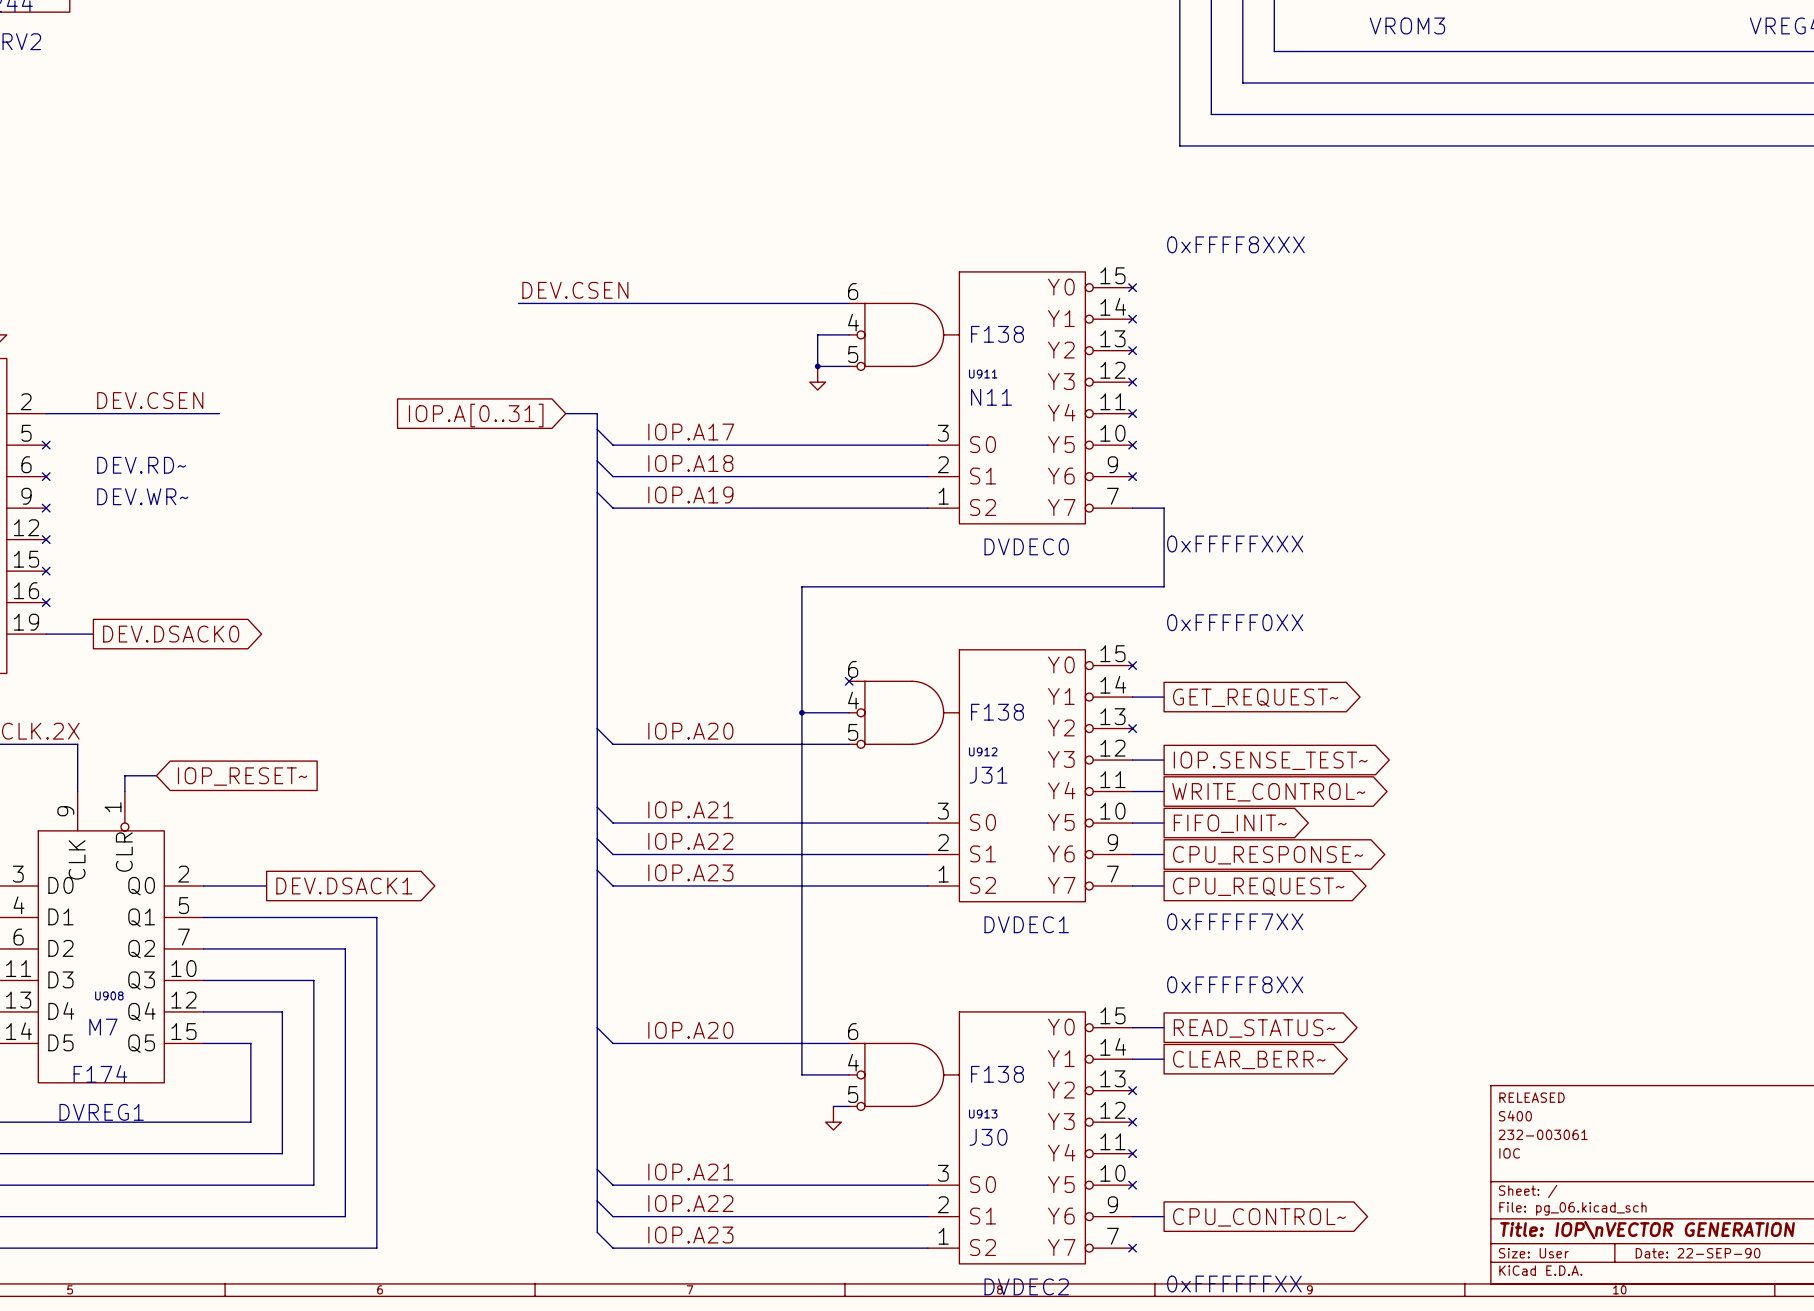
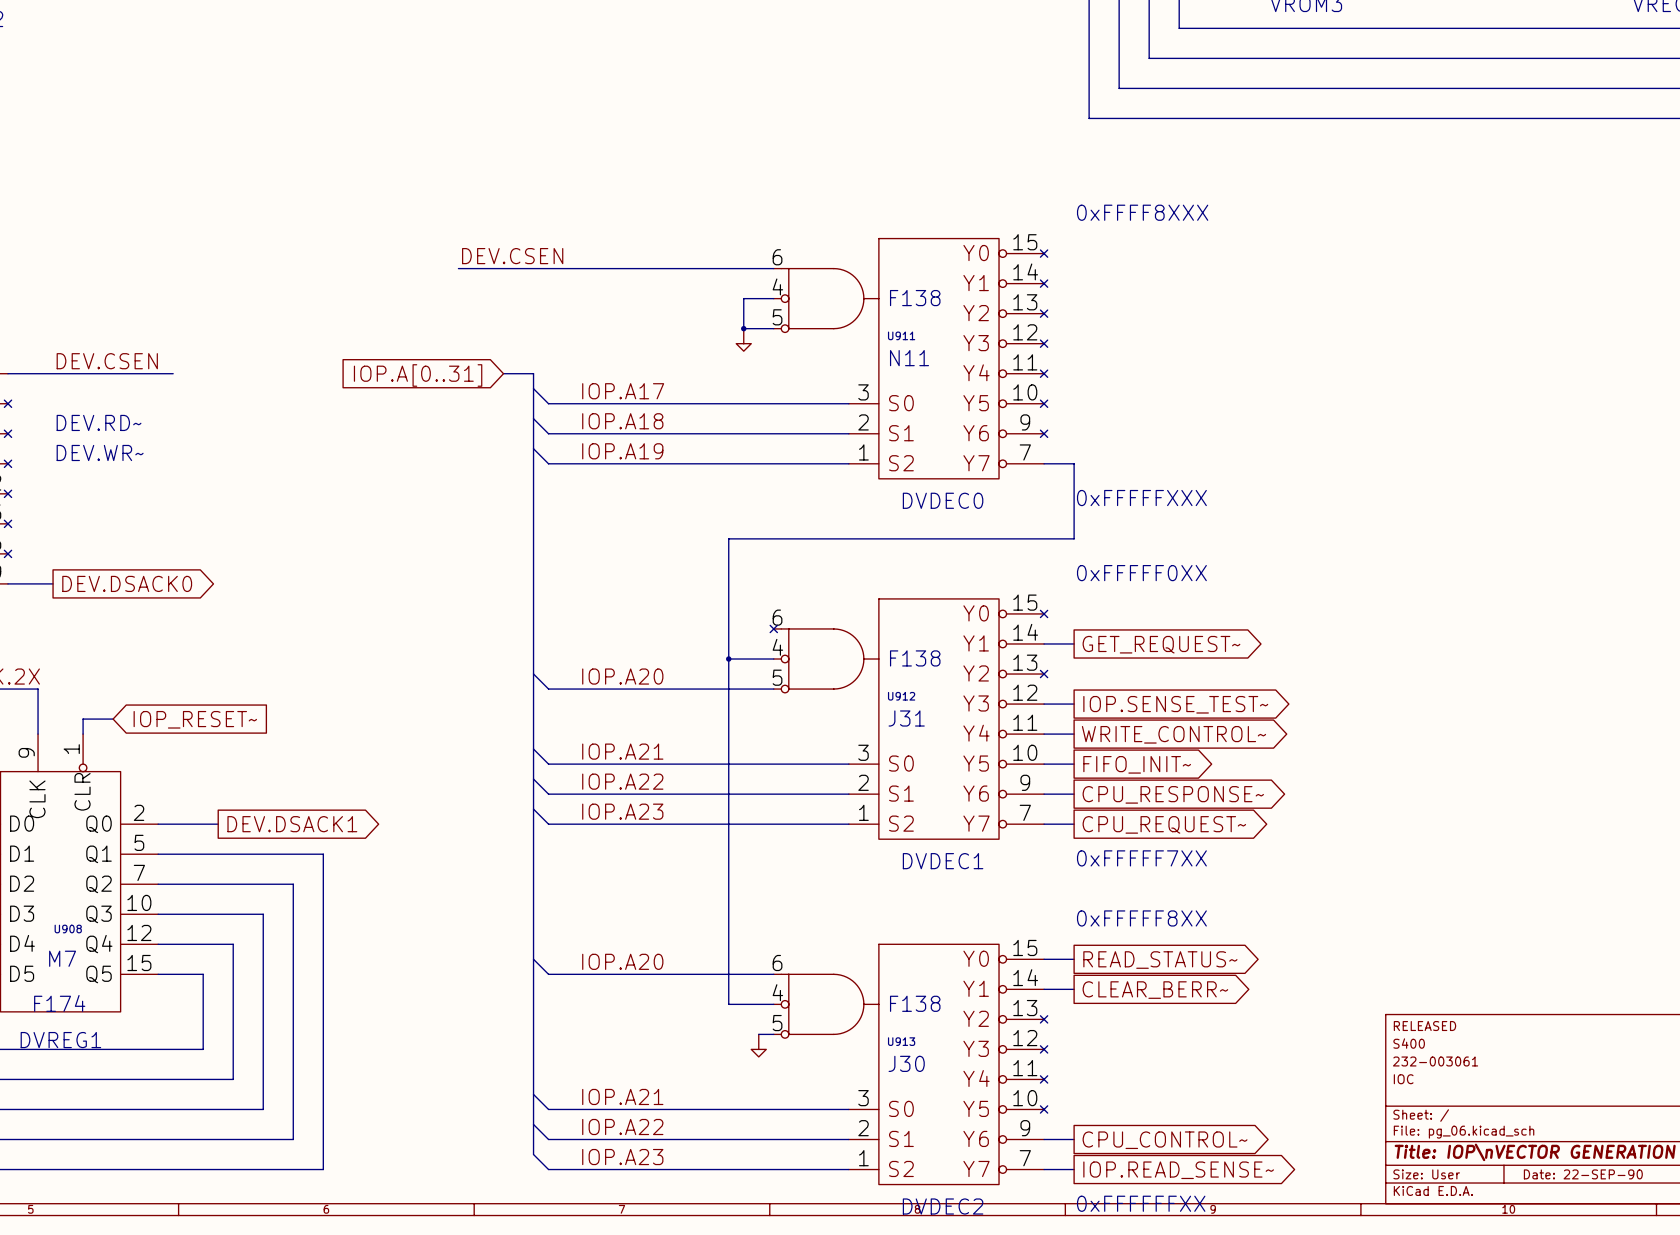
wire: none -> (1044, 1169) (1074, 1169)
no-connect mark: (1132, 1248) -> none
global label: none -> IOP.READ_SENSE~ (1178, 1170)

